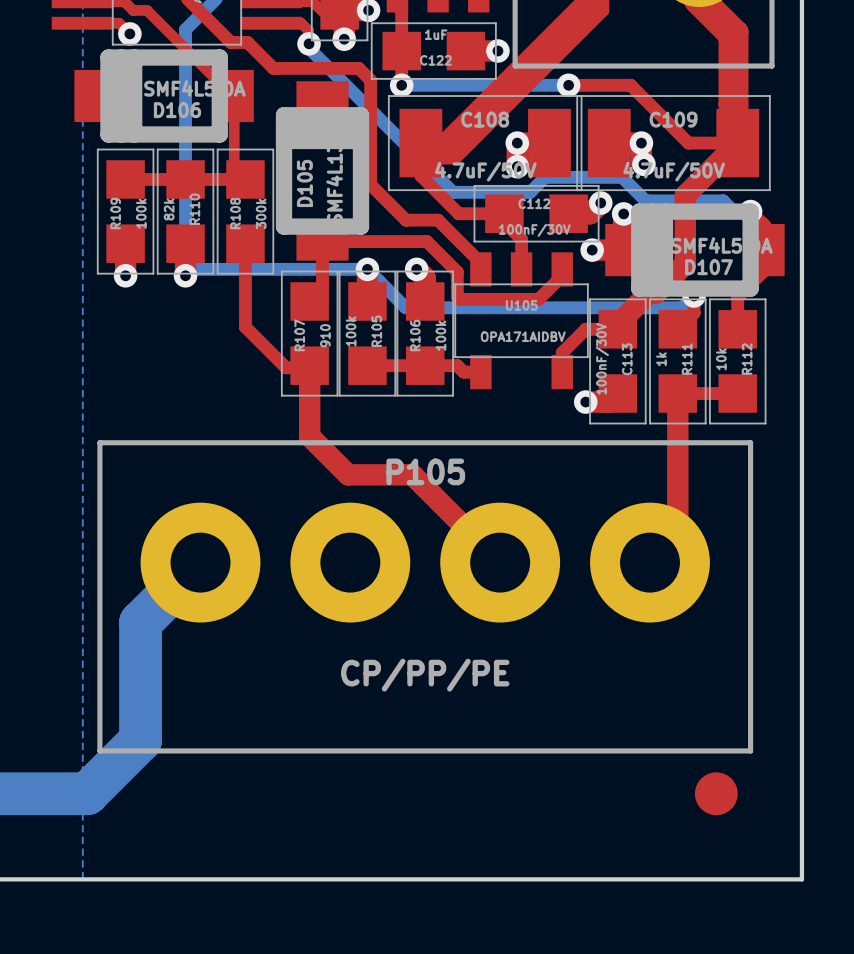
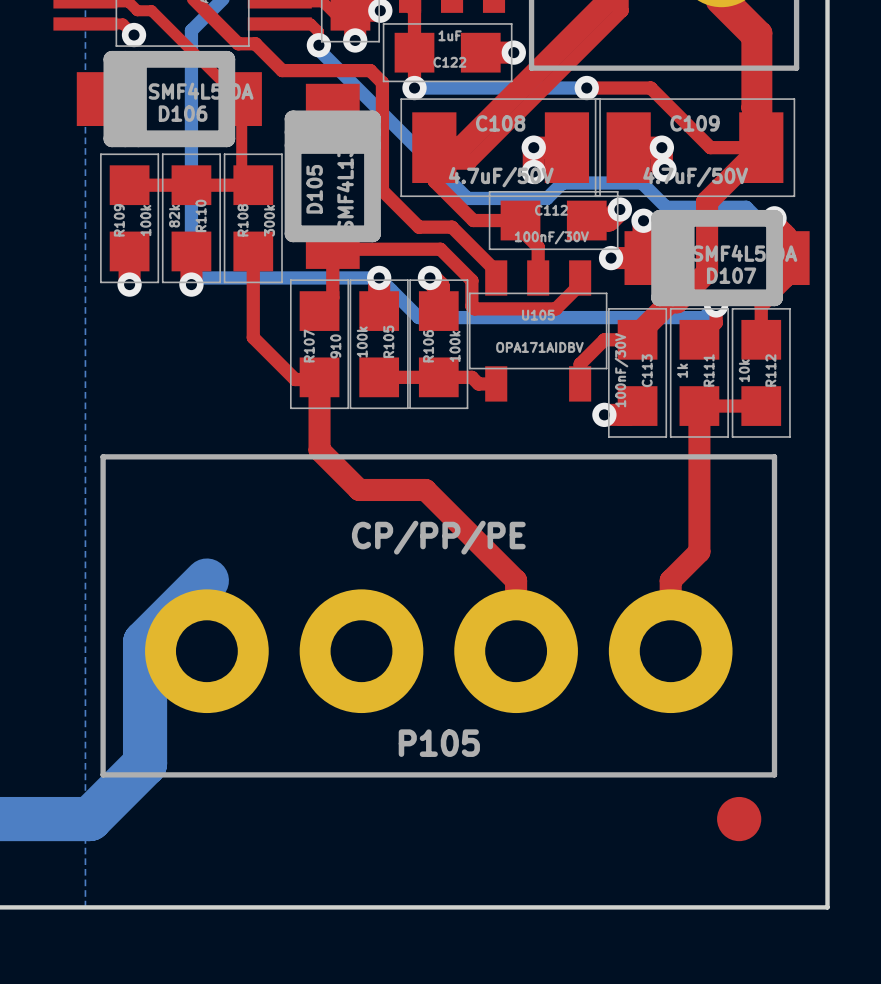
P105 rotation: 0° (425, 596) -> 180° (438, 615)

